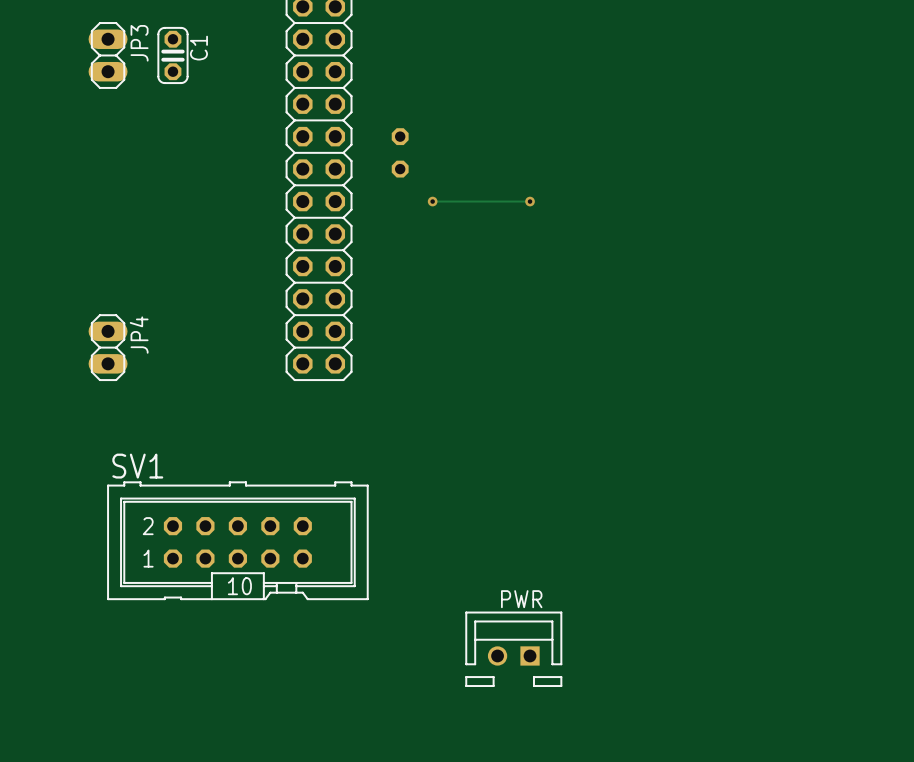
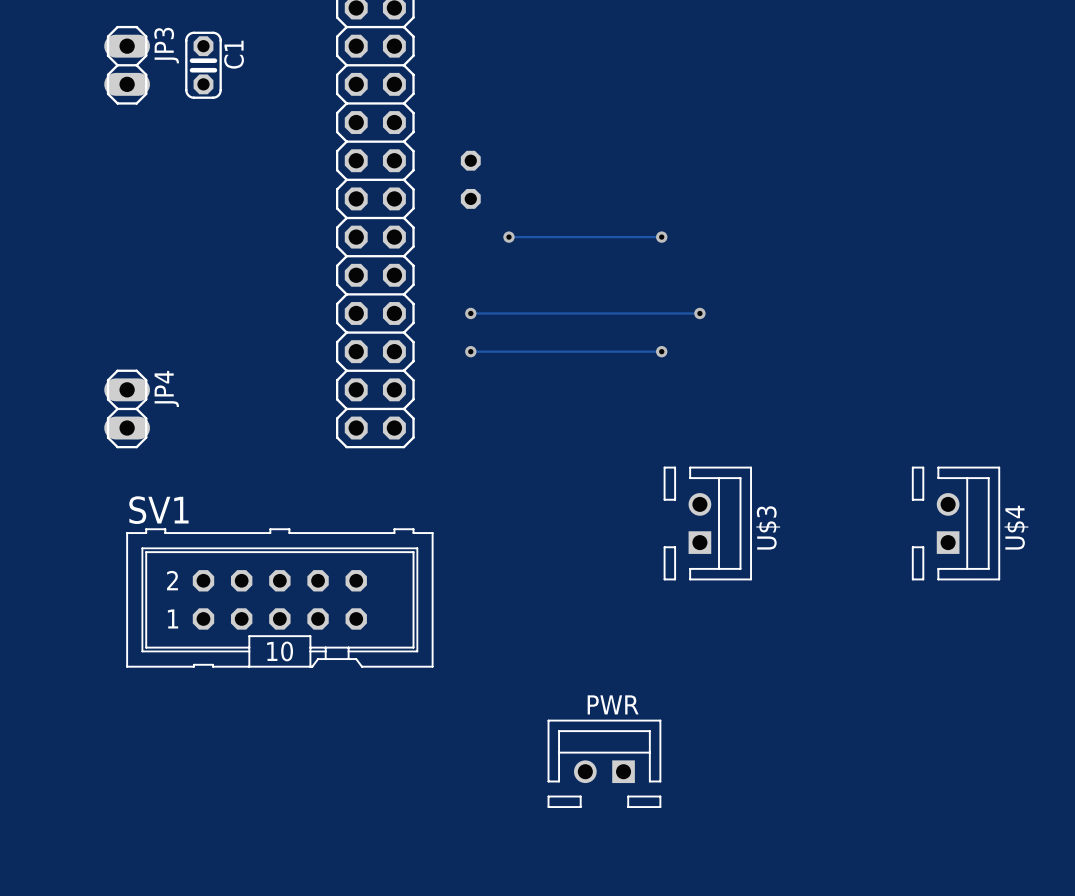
track: none -> (623, 237) (661, 237)
via position: (530, 201) -> (661, 237)
track: none -> (470, 313) (699, 313)
via: none -> (470, 313)
via: none -> (699, 313)
track: none -> (470, 351) (661, 351)
via: none -> (470, 351)
via: none -> (661, 351)
U$3: none -> (707, 523)
U$4: none -> (956, 523)
SV1 position: (237, 540) -> (279, 597)

